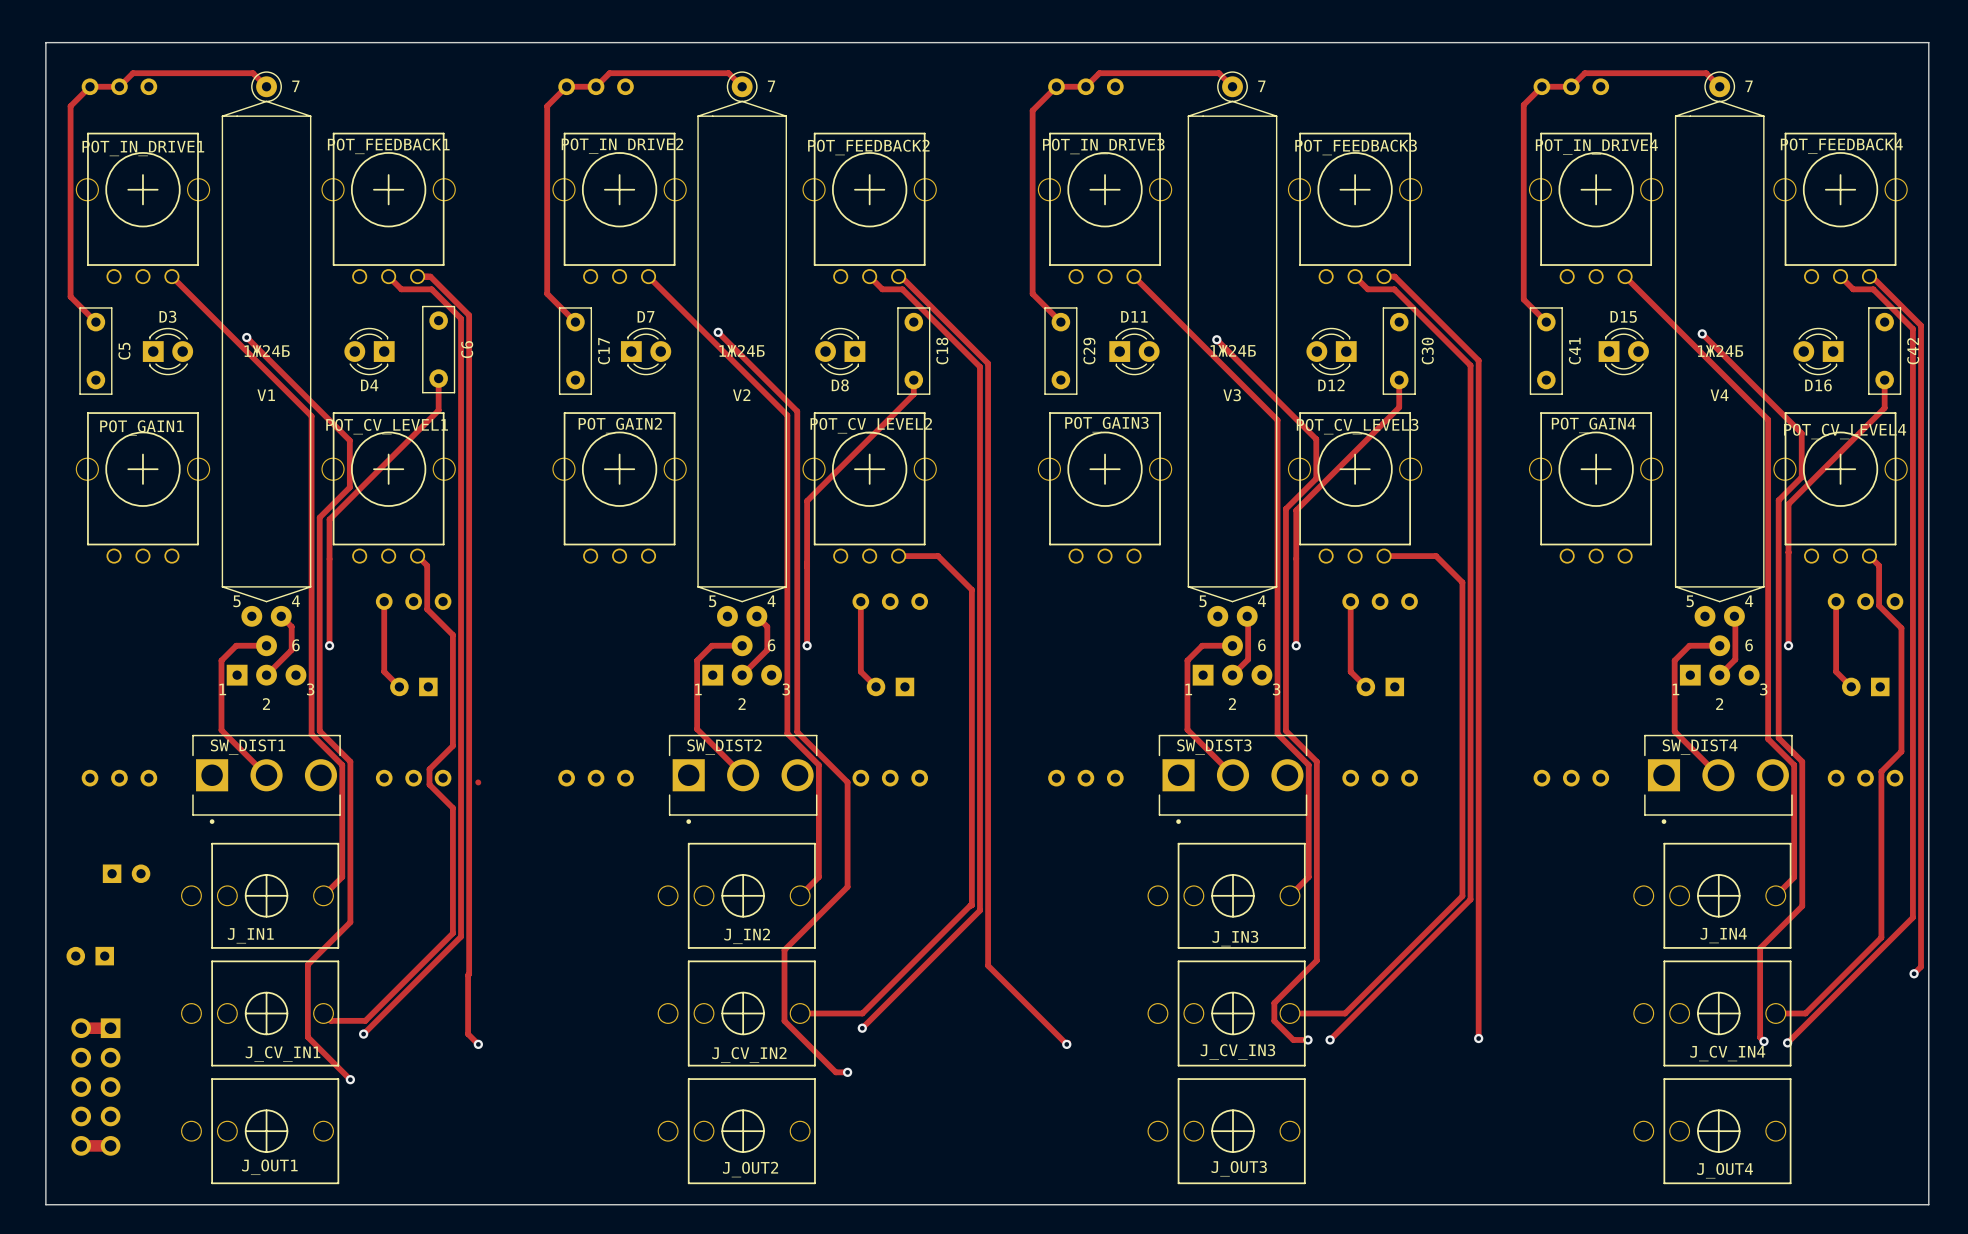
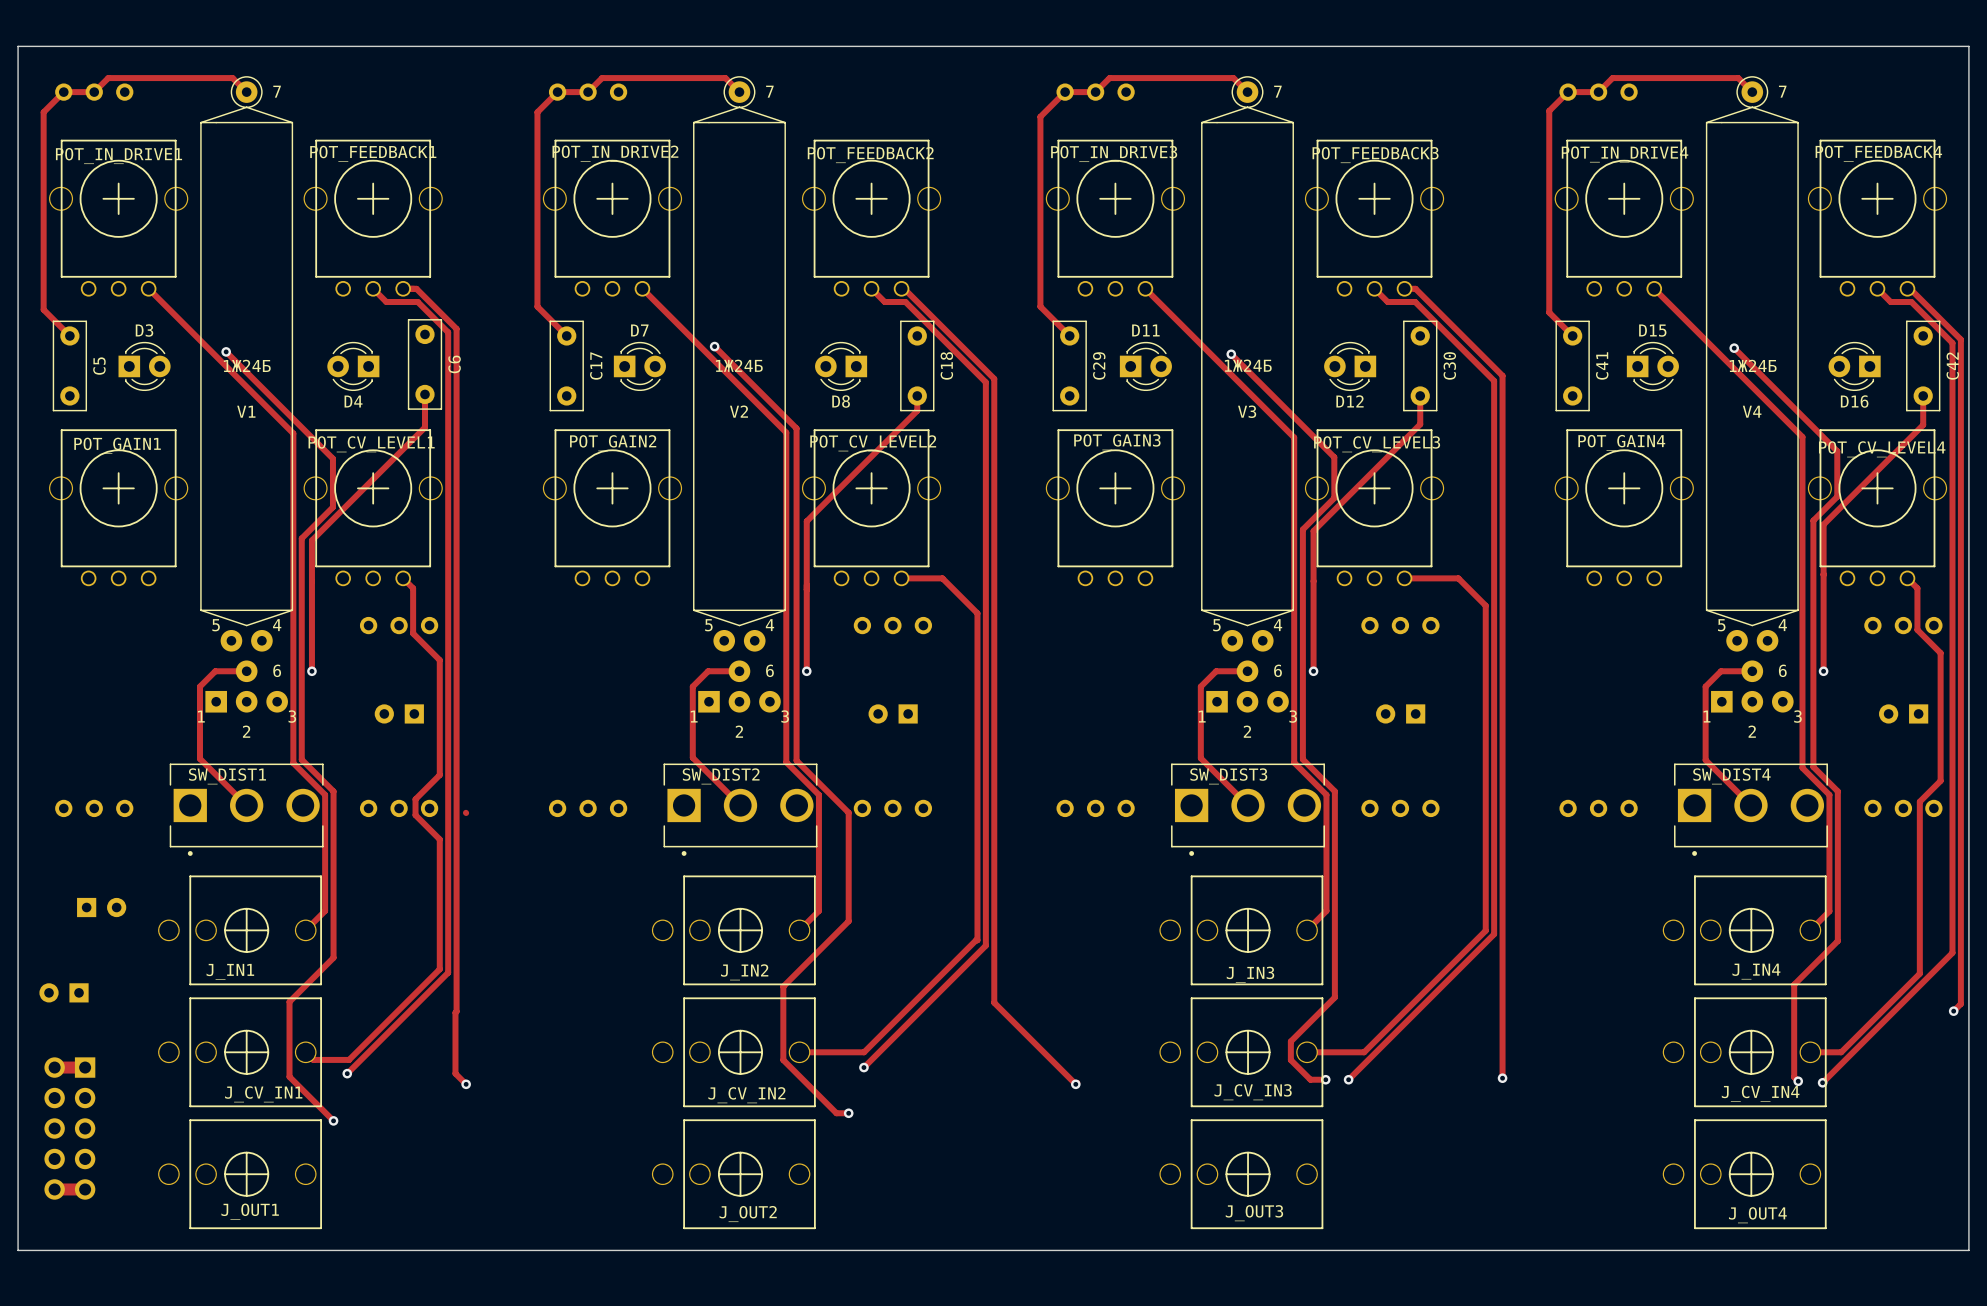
track: (384, 601) (384, 671) (399, 686) -> none
track: (860, 601) (860, 671) (876, 686) -> none
track: (1350, 601) (1350, 671) (1365, 686) -> none
track: (1836, 601) (1836, 671) (1851, 686) -> none
track: (281, 616) (291, 626) (291, 650) (266, 675) -> none
track: (756, 616) (767, 626) (767, 650) (742, 675) -> none
track: (1247, 616) (1248, 659) (1232, 675) -> none
track: (1734, 616) (1735, 659) (1719, 675) -> none

